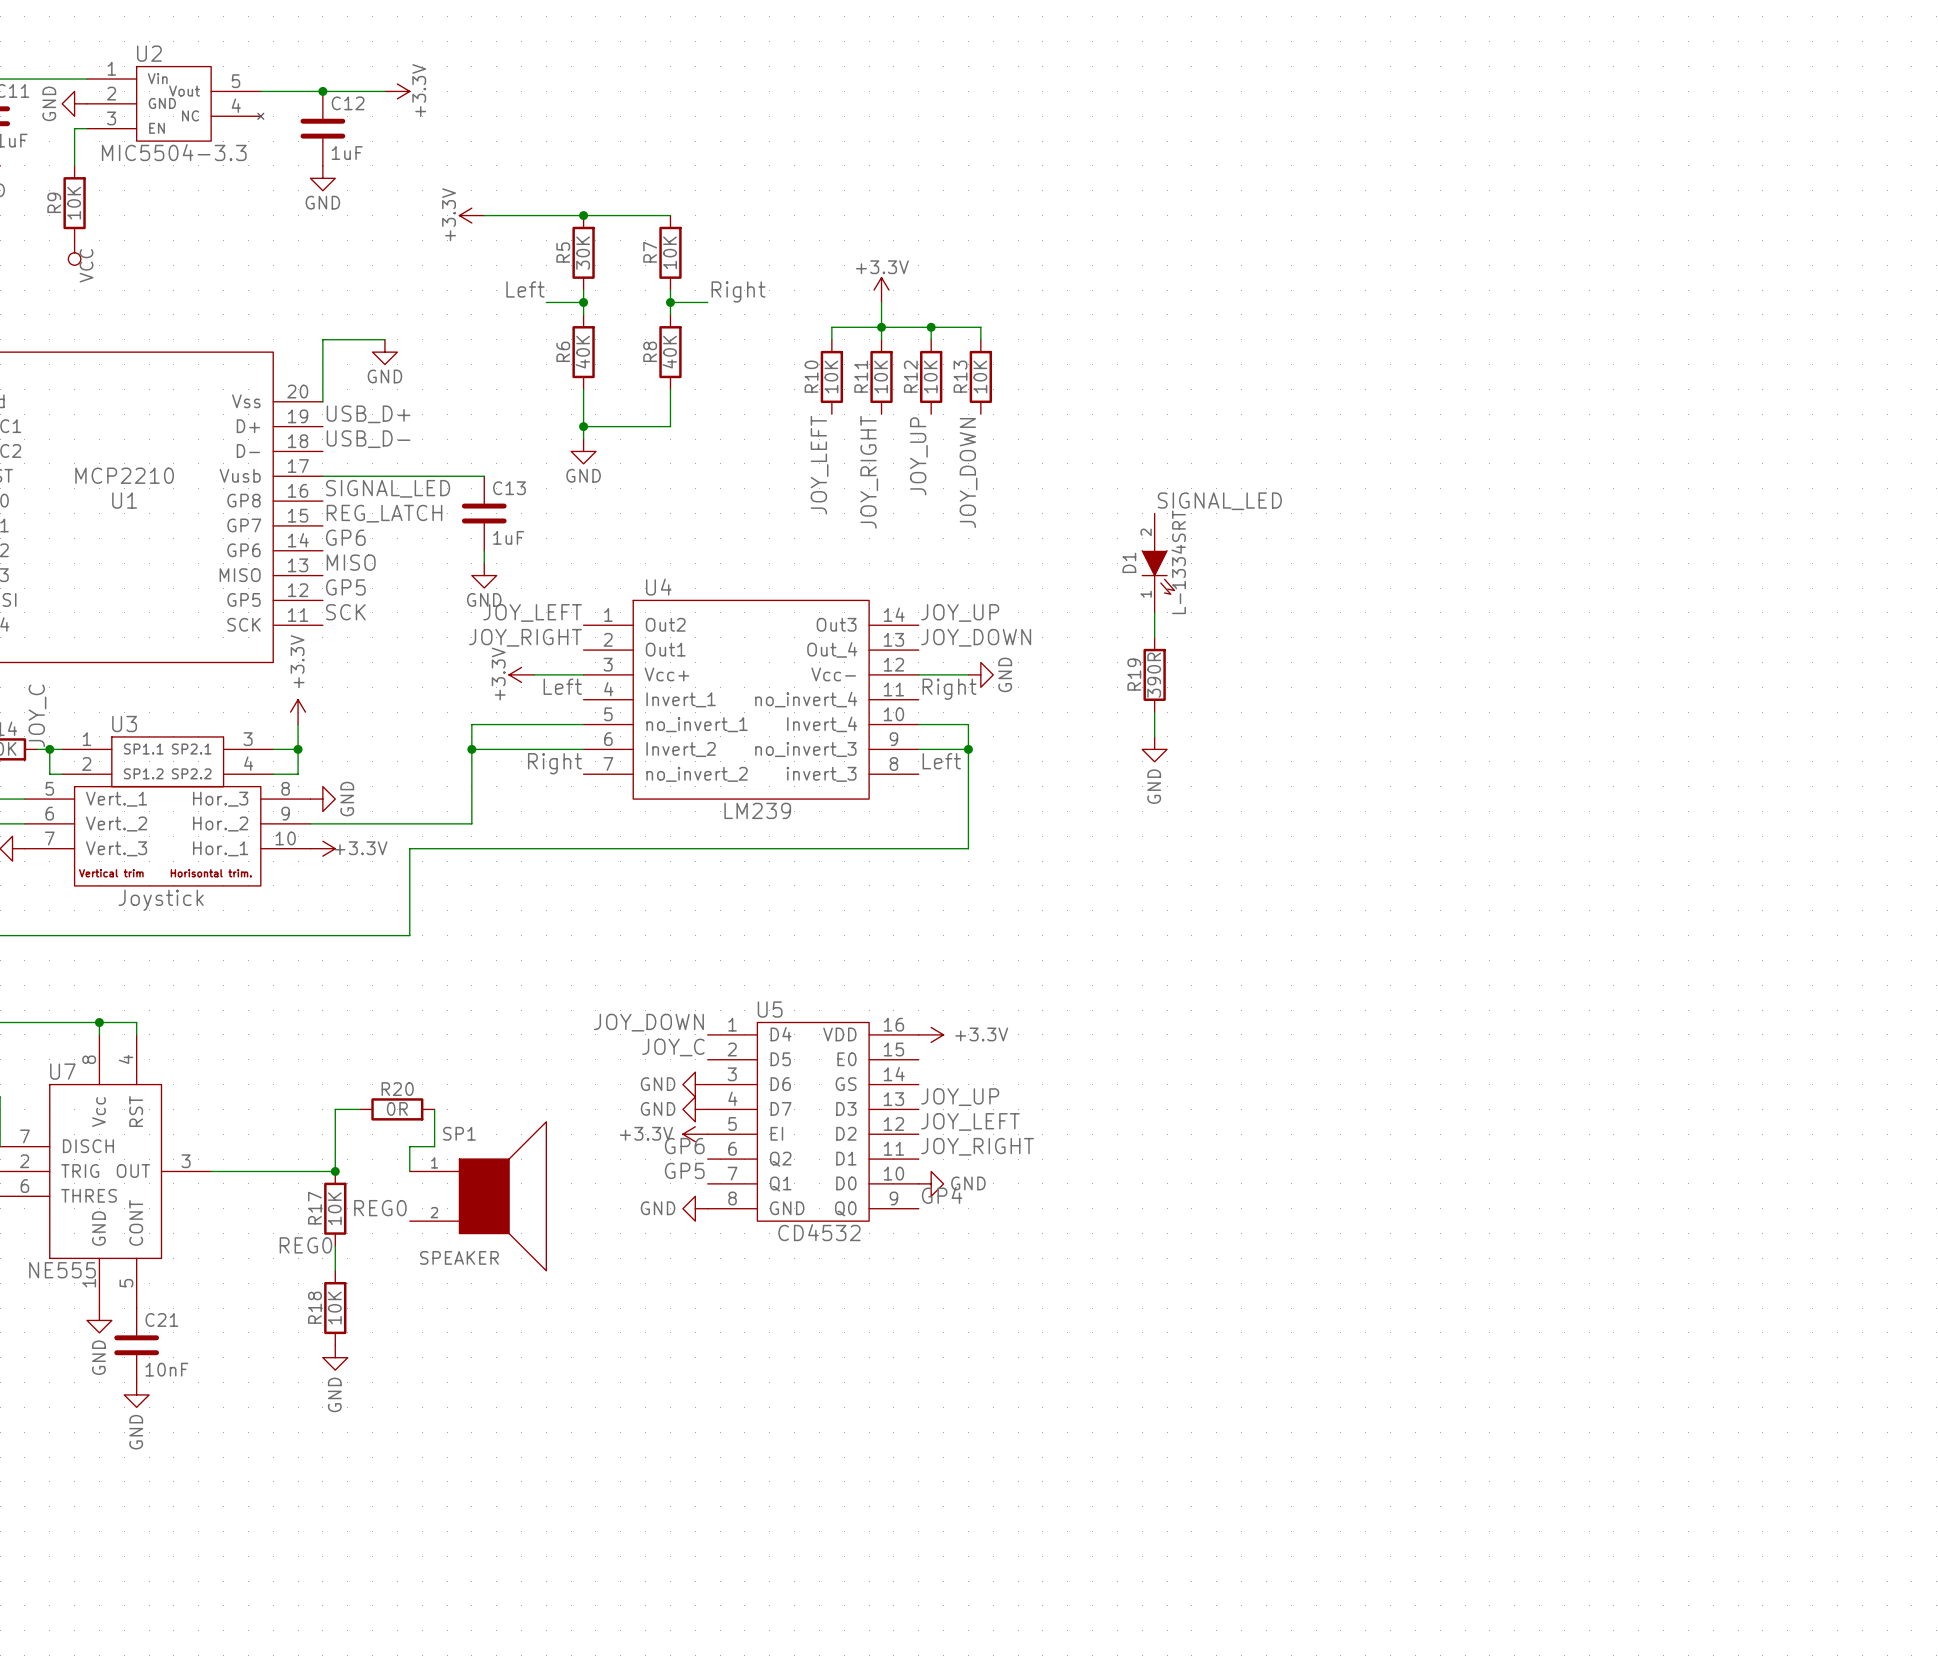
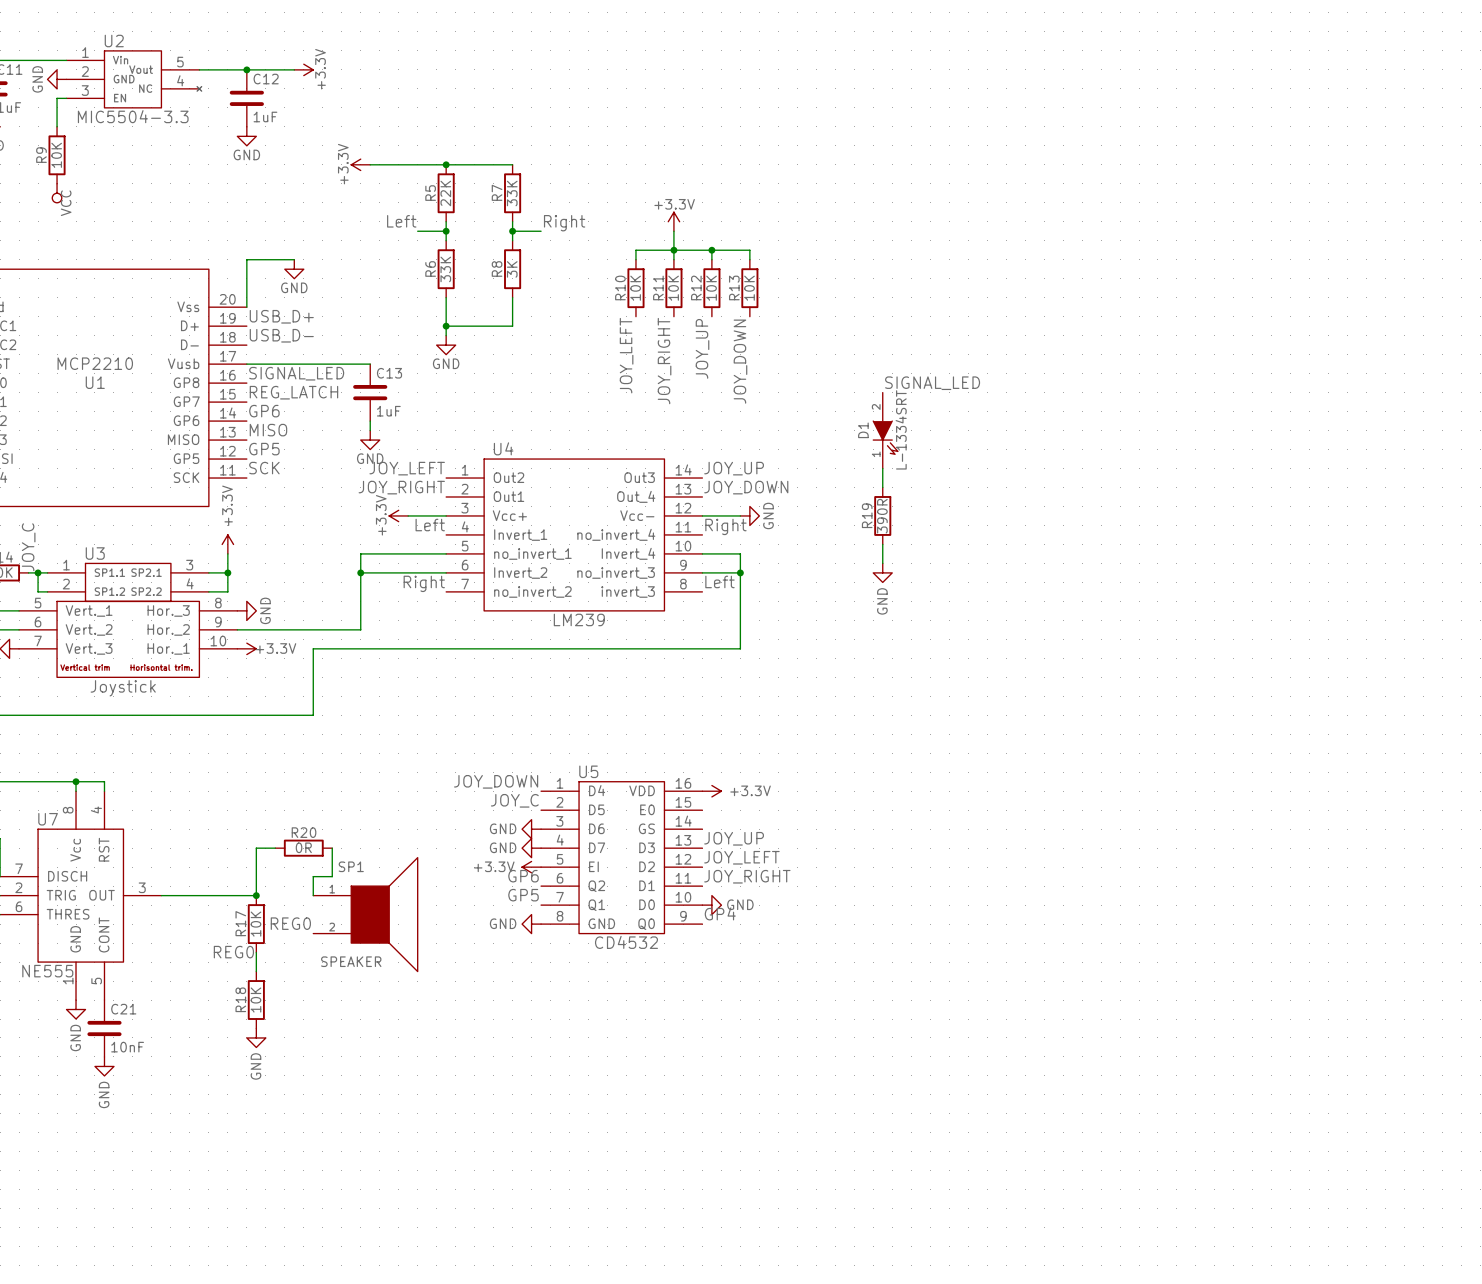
R7 value: 10K (670, 252) -> 33K (512, 193)
R5 value: 30K (583, 253) -> 22K (445, 193)
R6 value: 40K (582, 352) -> 33K (445, 269)
R8 value: 40K (669, 352) -> 3K (512, 269)

